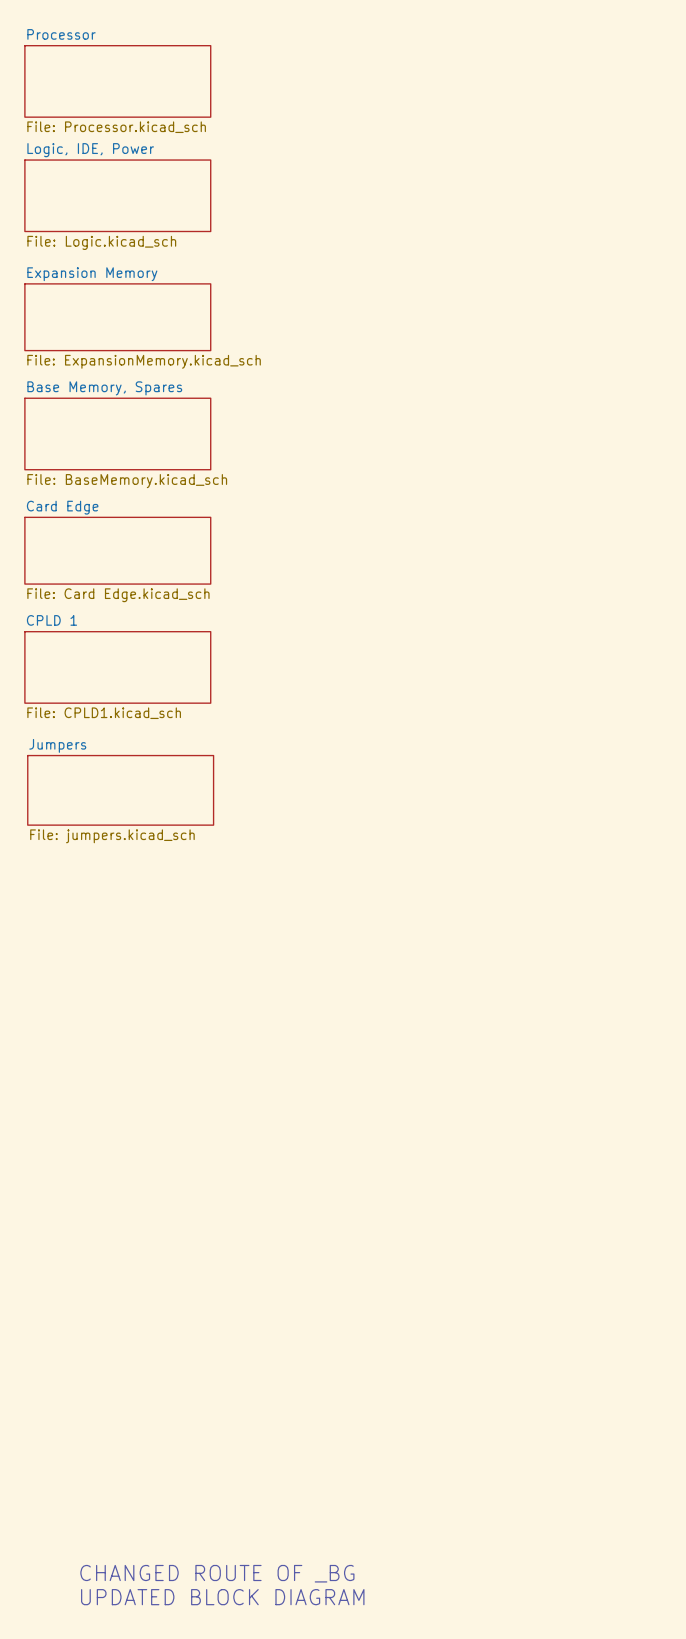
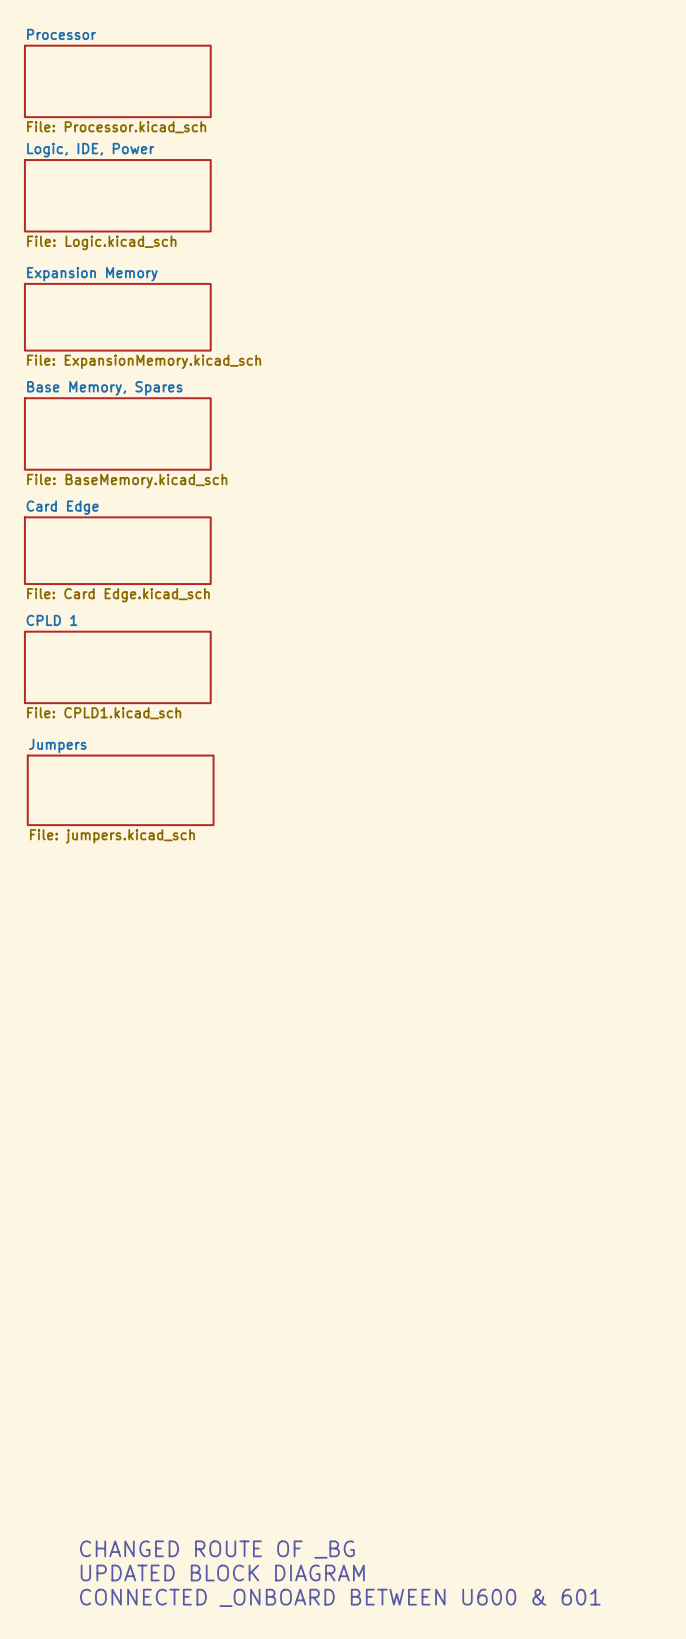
text: none -> CHANGED ROUTE OF _BG (217, 1549)
text: CHANGED ROUTE OF _BG (217, 1573) -> UPDATED BLOCK DIAGRAM (222, 1572)
text: UPDATED BLOCK DIAGRAM (222, 1597) -> CONNECTED _ONBOARD BETWEEN U600 & 601 (340, 1597)

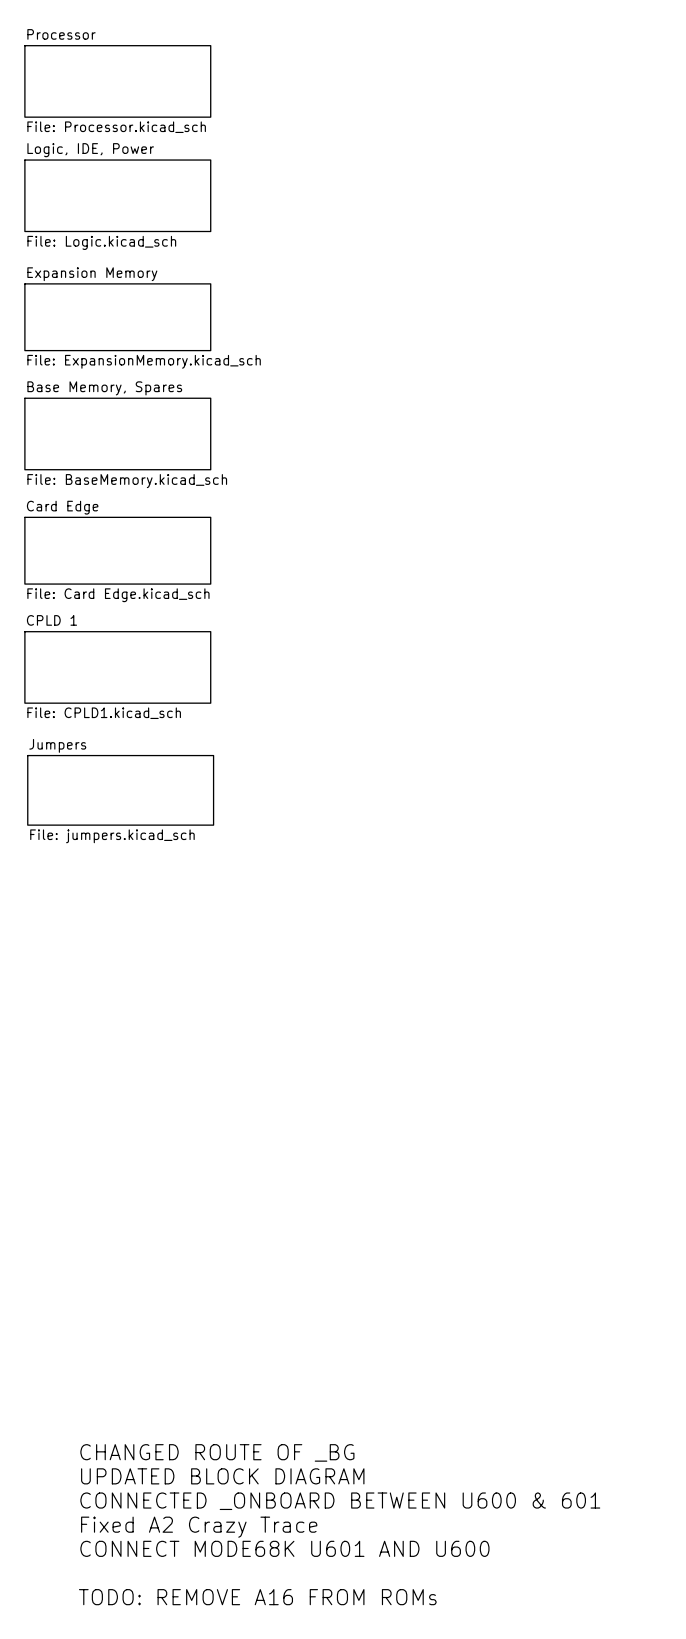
text: none -> CHANGED ROUTE OF _BG (217, 1452)
text: none -> CONNECTED _ONBOARD BETWEEN U600 & 601 (340, 1501)
text: none -> Fixed A2 Crazy Trace (199, 1527)
text: CHANGED ROUTE OF _BG (217, 1549) -> CONNECT MODE68K U601 AND U600 (284, 1548)
text position: UPDATED BLOCK DIAGRAM (222, 1572) -> UPDATED BLOCK DIAGRAM (222, 1476)
text: CONNECTED _ONBOARD BETWEEN U600 & 601 (340, 1597) -> TODO: REMOVE A16 FROM ROMs (257, 1597)

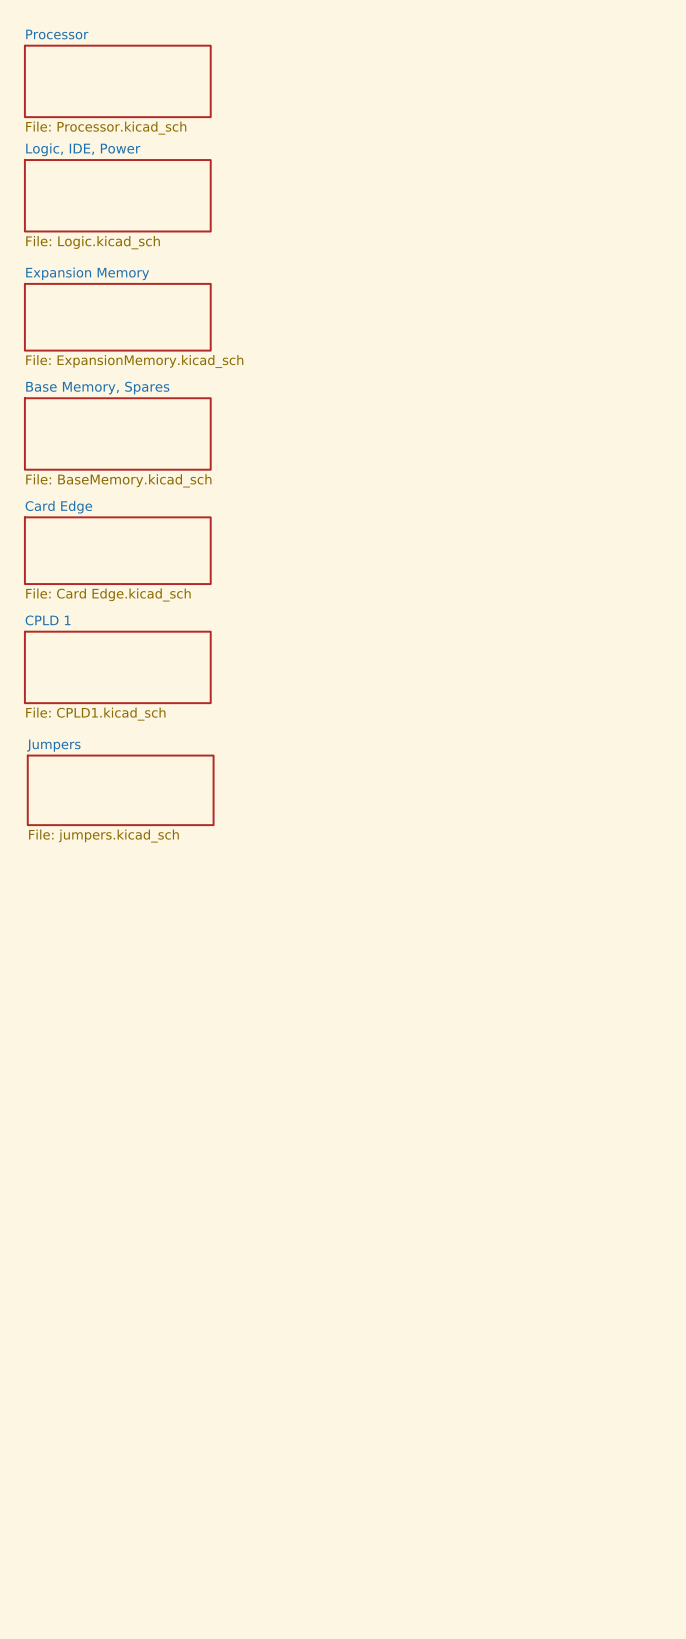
text: CHANGED ROUTE OF _BG (217, 1452) -> none
text: UPDATED BLOCK DIAGRAM (222, 1476) -> none
text: CONNECTED _ONBOARD BETWEEN U600 & 601 (340, 1501) -> none
text: Fixed A2 Crazy Trace (199, 1527) -> none
text: CONNECT MODE68K U601 AND U600 (284, 1548) -> none
text: TODO: REMOVE A16 FROM ROMs (257, 1597) -> none

